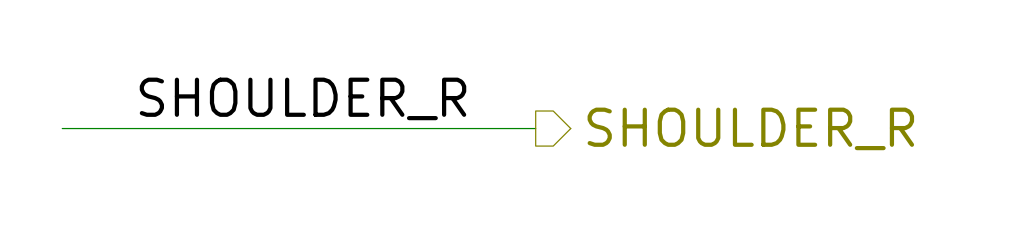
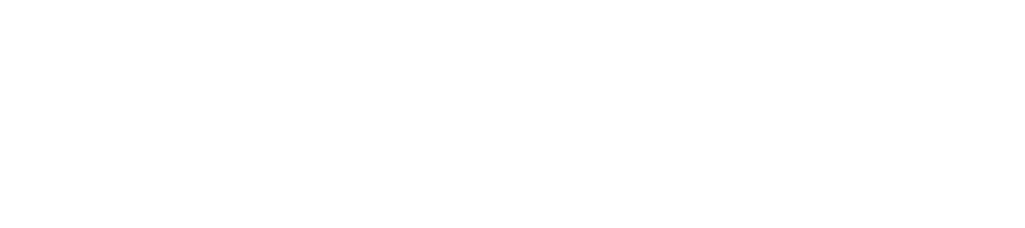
label: SHOULDER_R (303, 98) -> none
wire: (62, 128) (535, 128) -> none
hierarchical label: SHOULDER_R (750, 128) -> none

